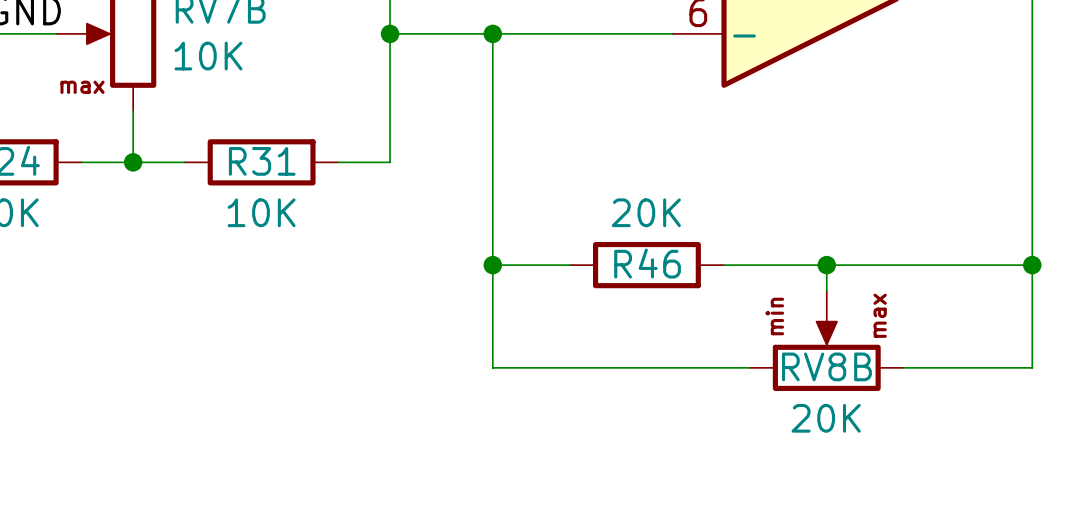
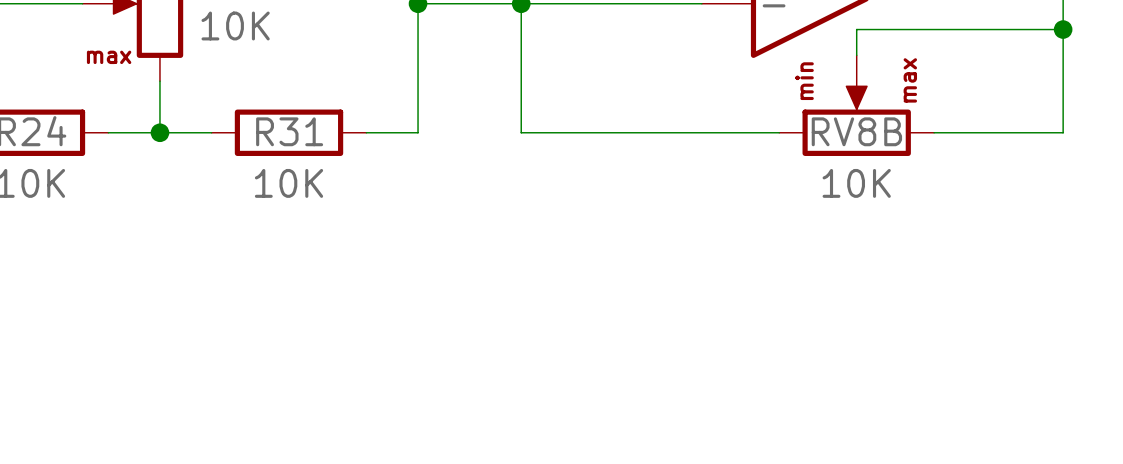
wire: none -> (1063, 29) (856, 29) (856, 55)
junction: none -> (1063, 29)
wire: (492, 162) (492, 367) (749, 367) -> (521, 132) (779, 132)
wire: (1032, 162) (1032, 367) (903, 367) -> (1063, 132) (934, 132)
wire: (492, 265) (569, 265) -> none
junction: (492, 265) -> none
R46: 20K (646, 265) -> none
wire: (724, 265) (1032, 265) -> none
wire: (826, 265) (826, 290) -> none
junction: (826, 265) -> none
junction: (1032, 265) -> none
RV8B position: (826, 340) -> (856, 105)
RV8B value: 20K (826, 418) -> 10K (856, 183)

